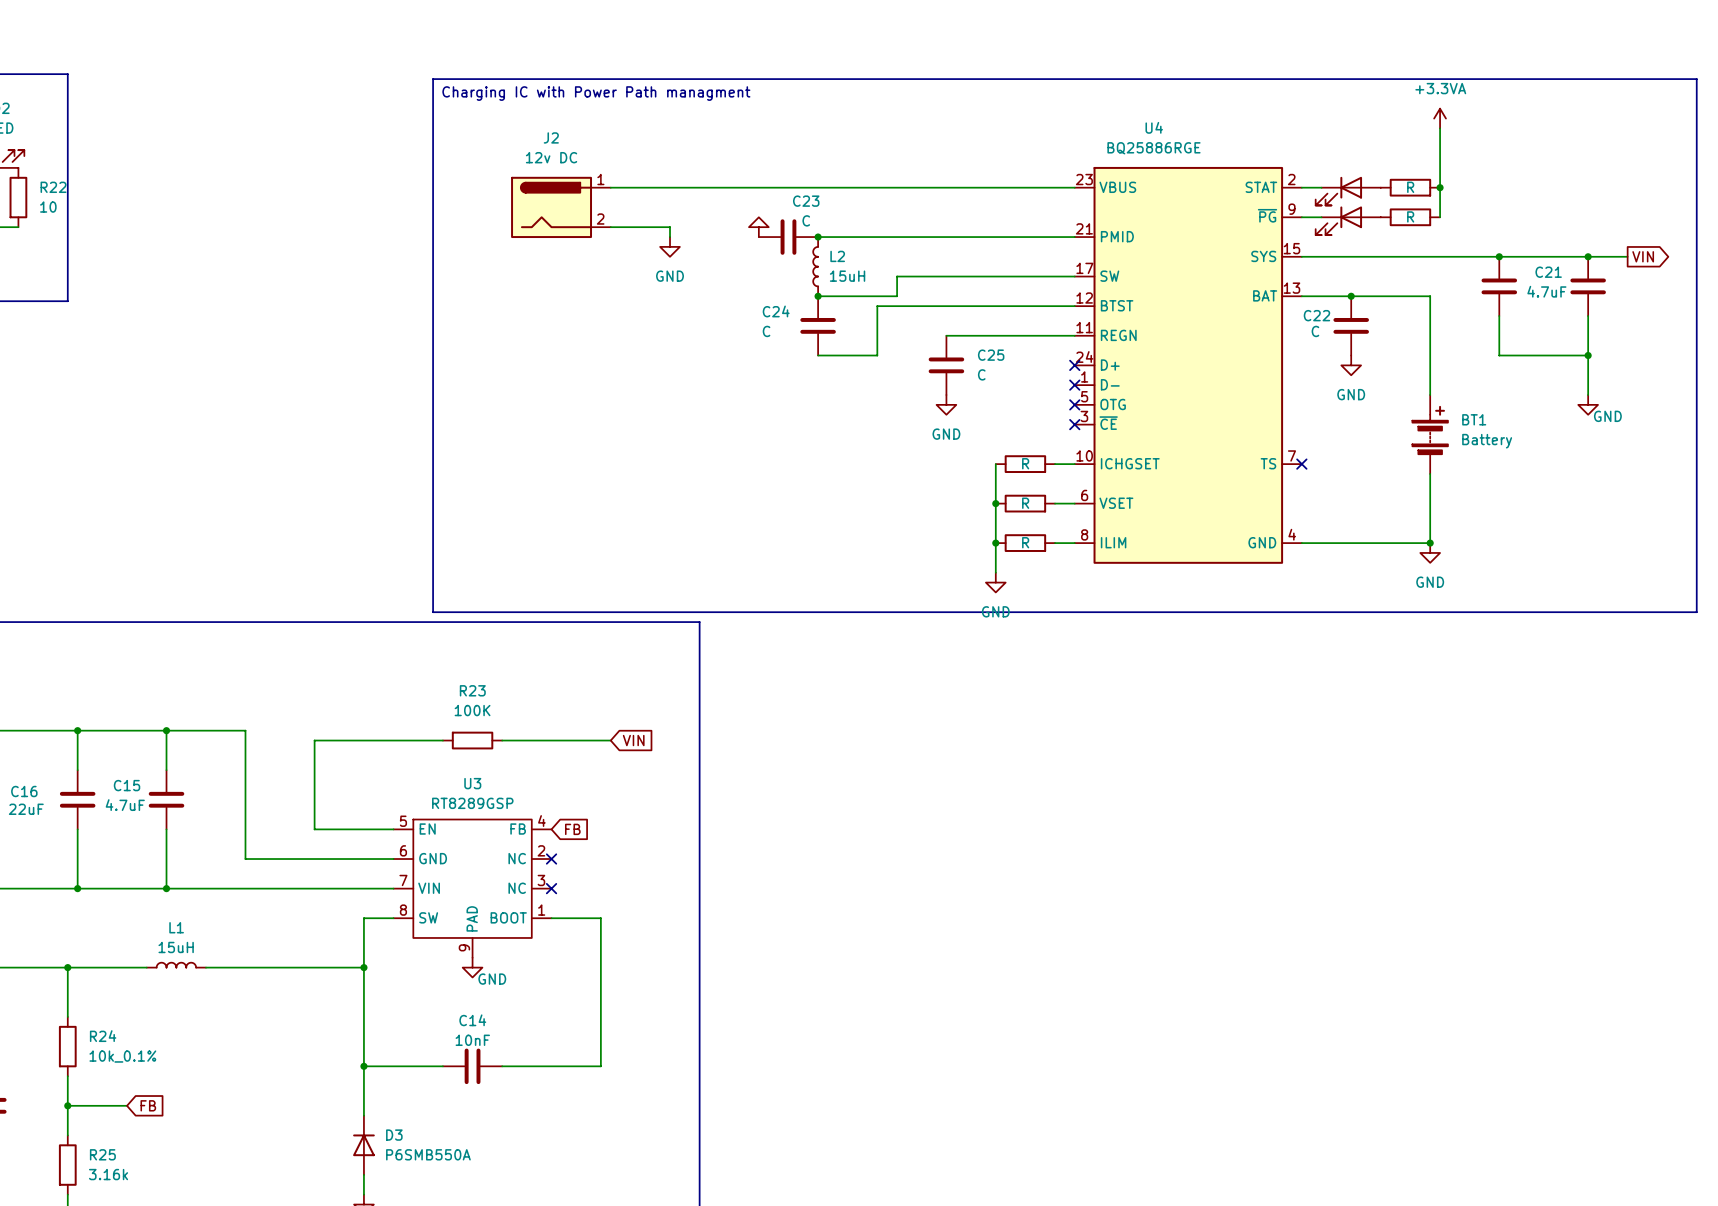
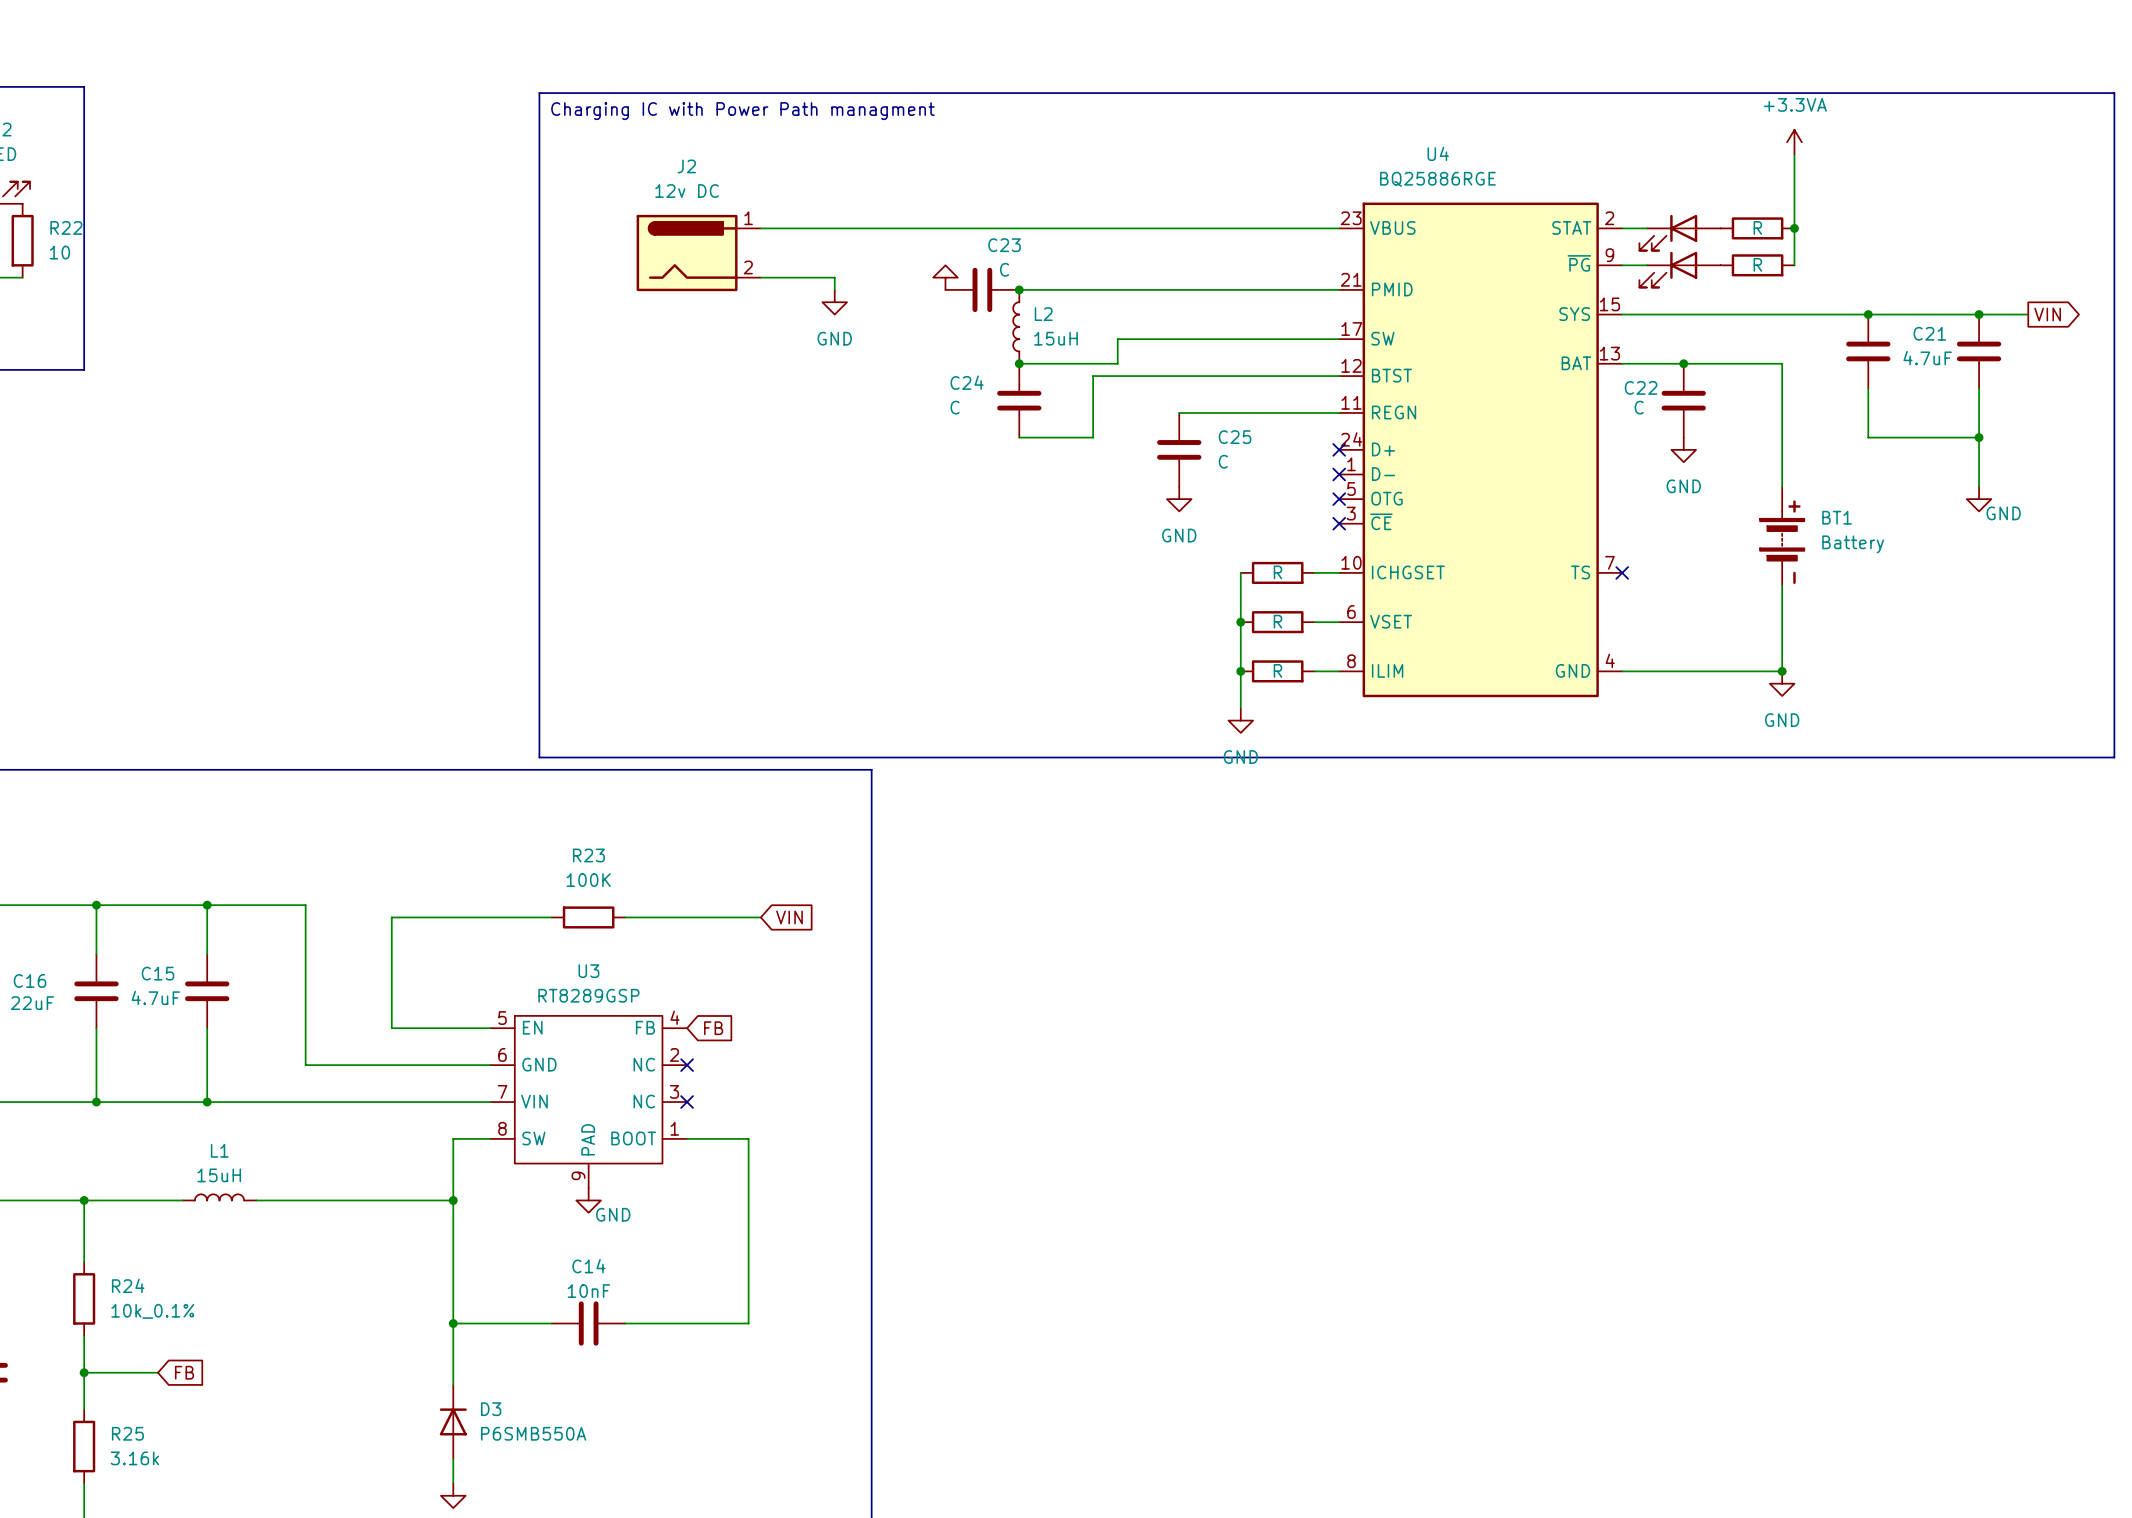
BT1 symbol: [1412, 395, 1448, 474] -> [1760, 486, 1805, 586]

